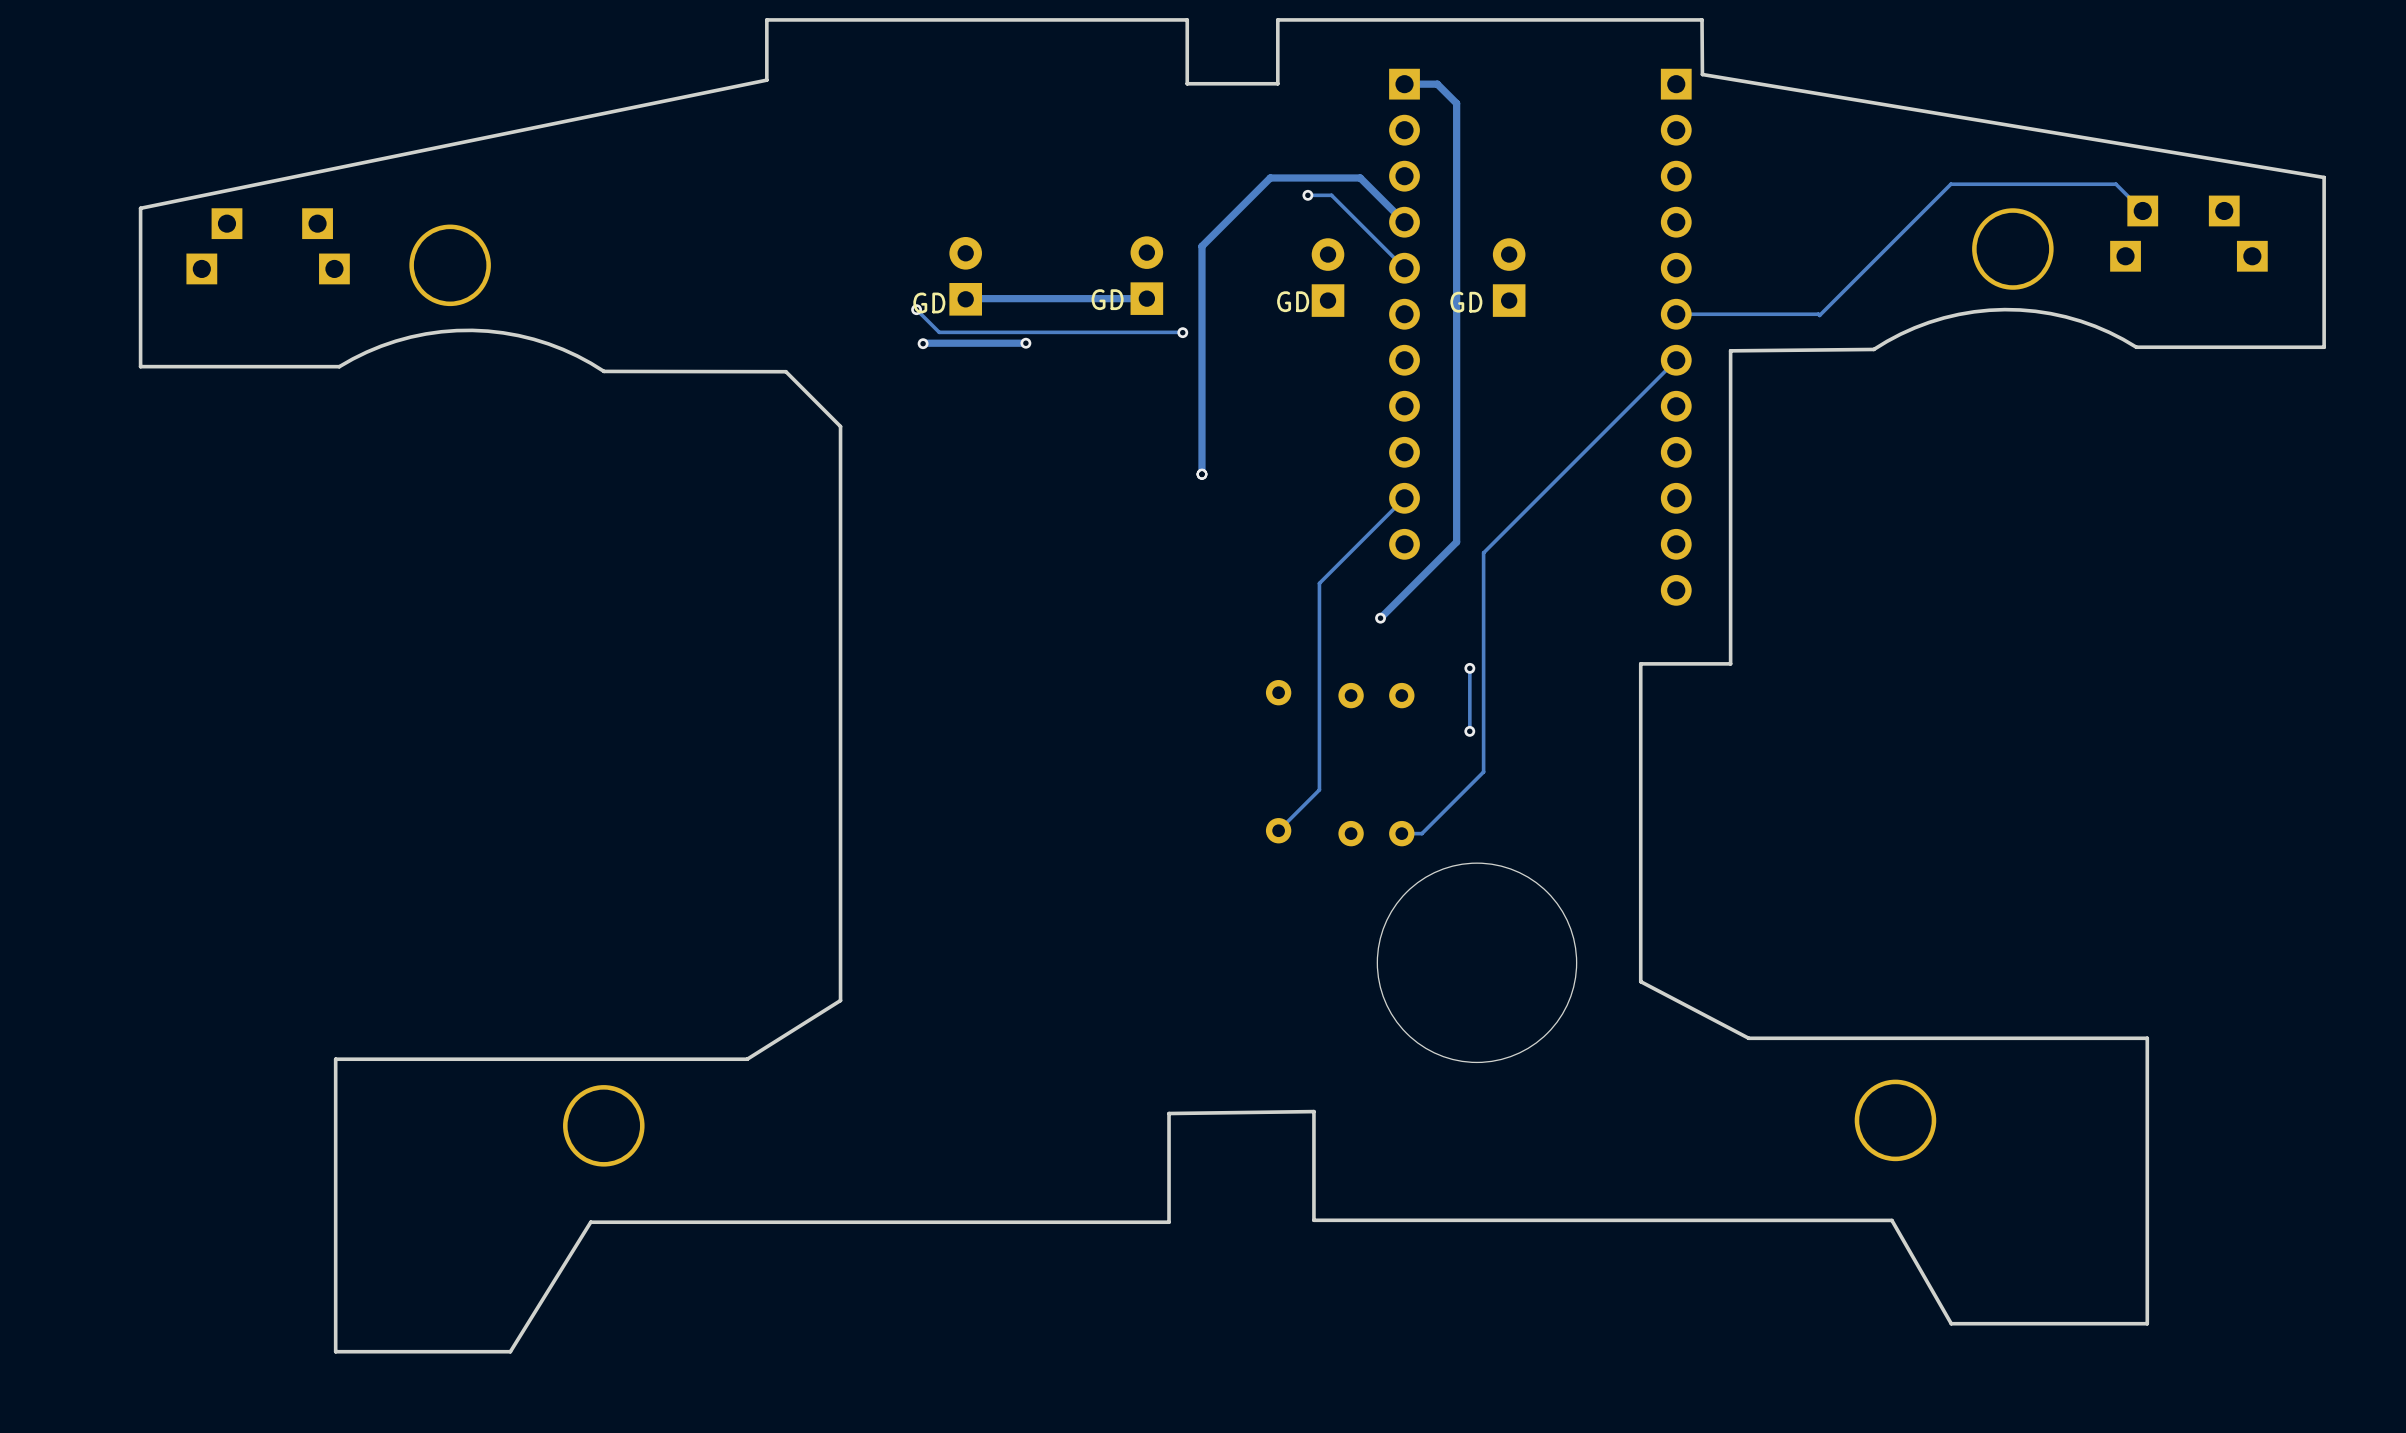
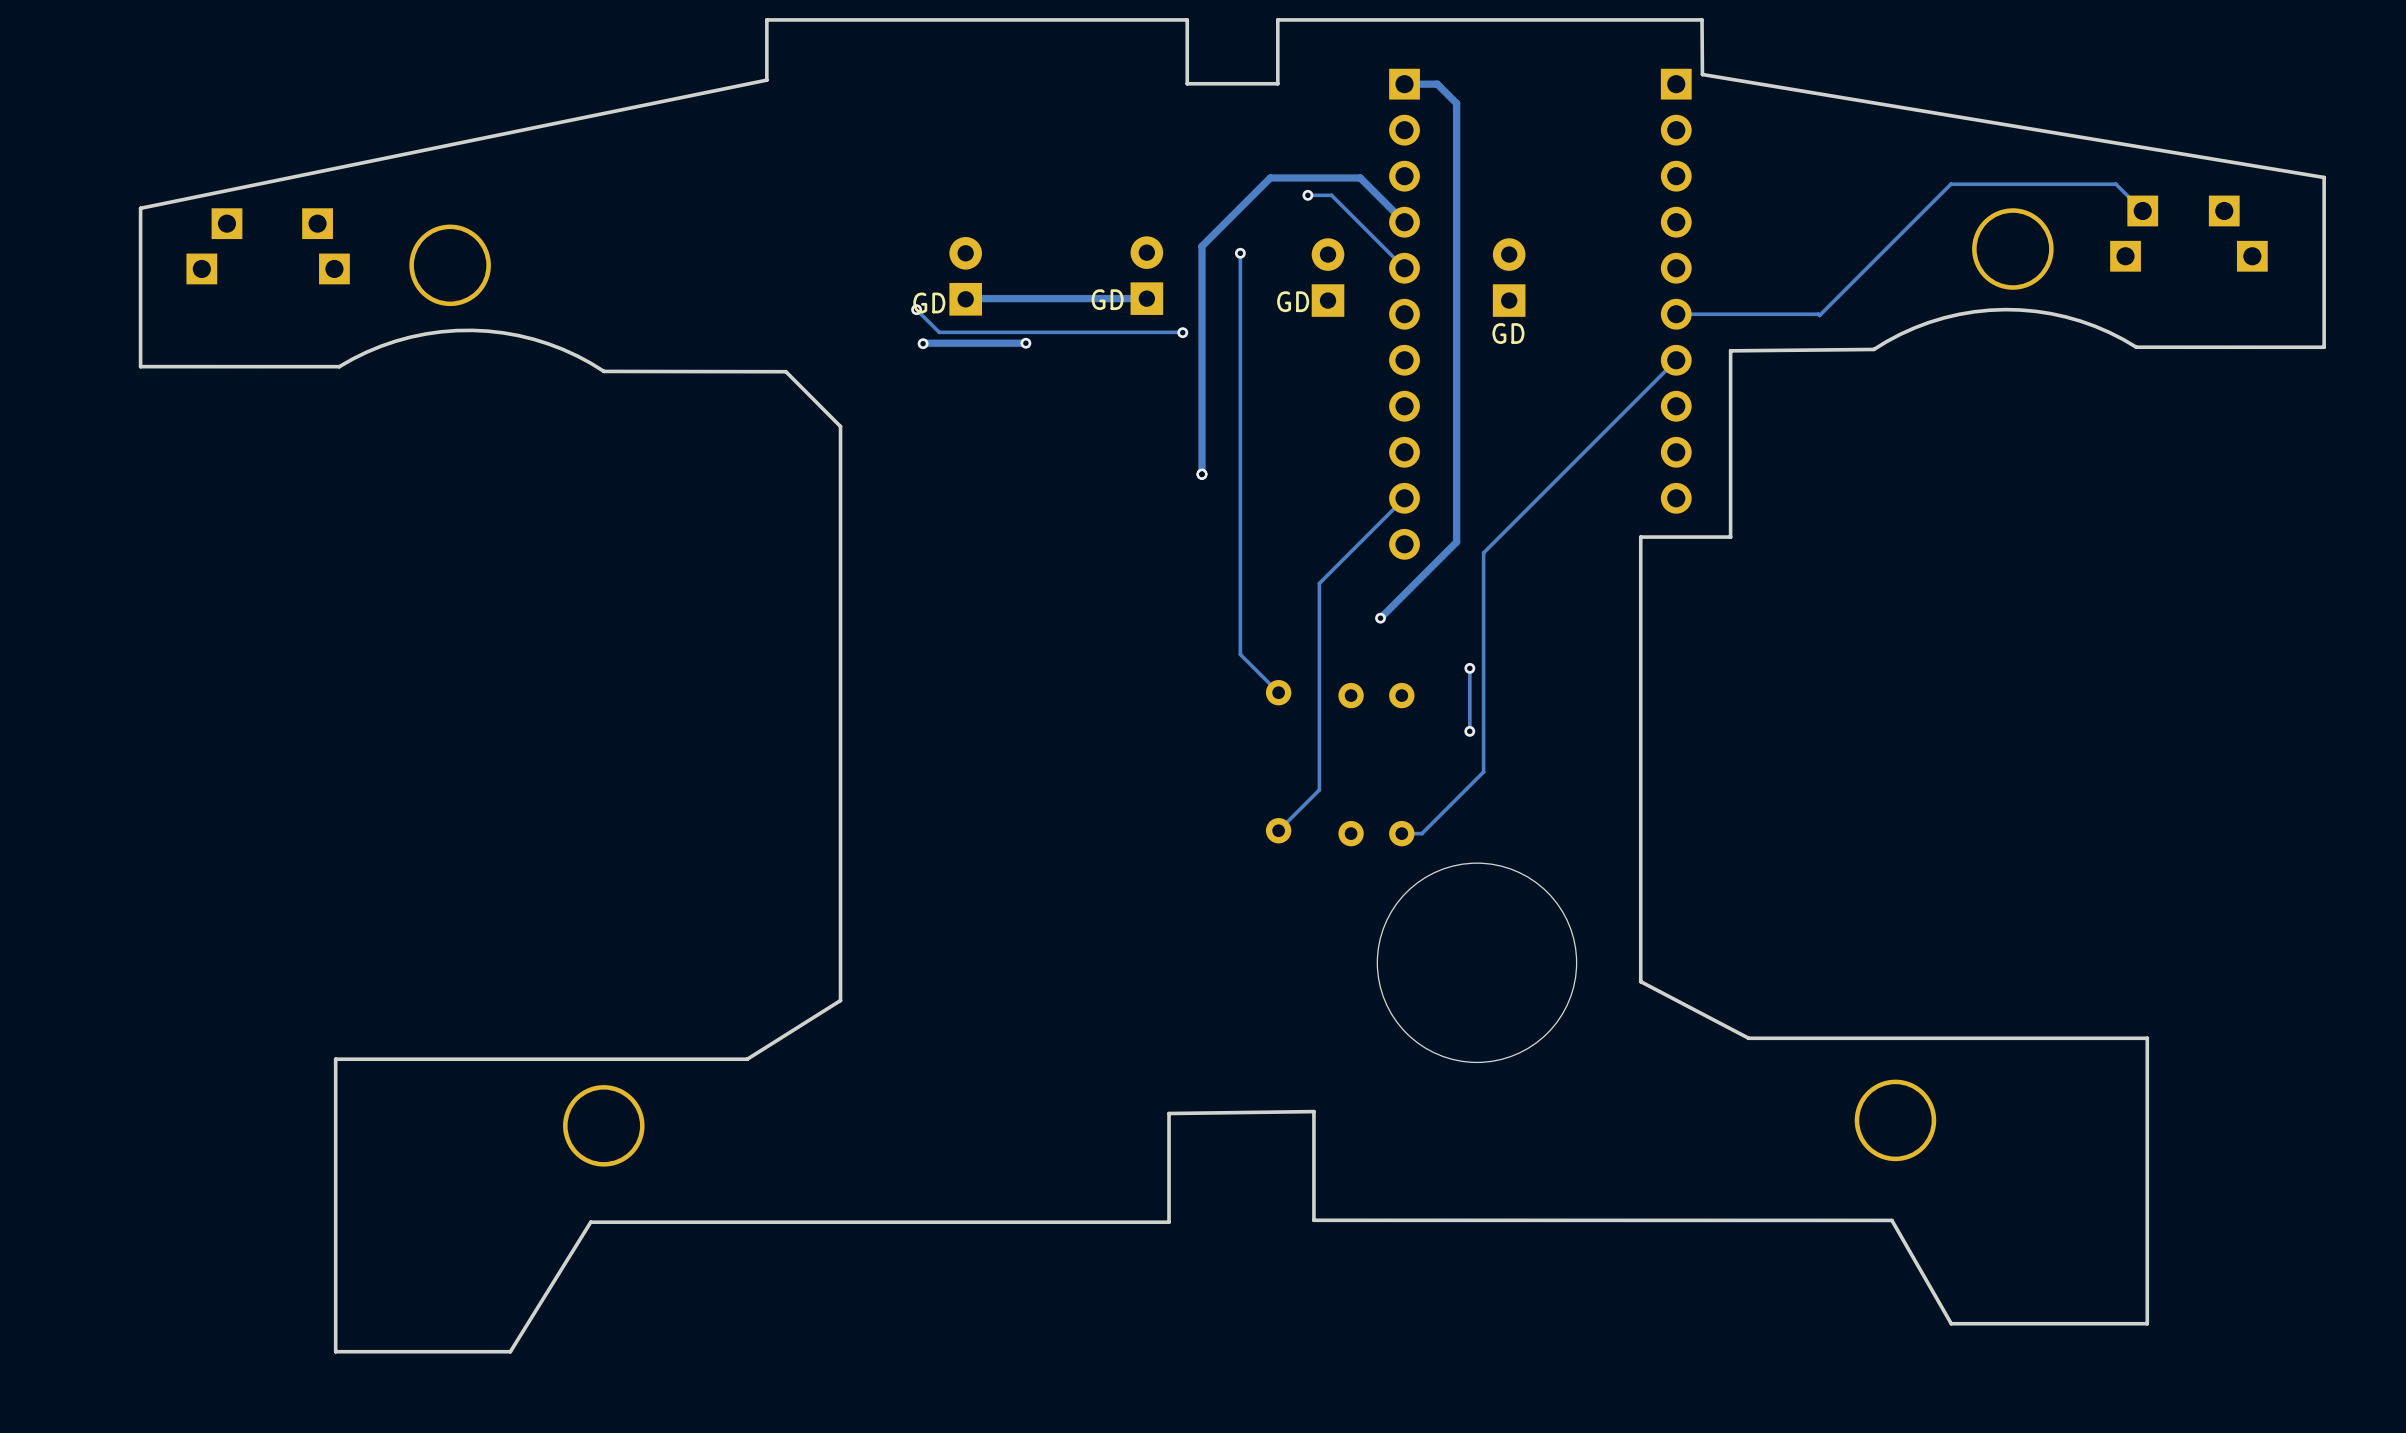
track: none -> (1240, 253) (1240, 654) (1278, 692)
via: none -> (1240, 253)
text position: GD (1466, 302) -> GD (1508, 333)
part: (1676, 337) -> none
board edge: (1730, 537) (1730, 663) (1640, 663) -> (1730, 537) (1640, 537) (1640, 663)

